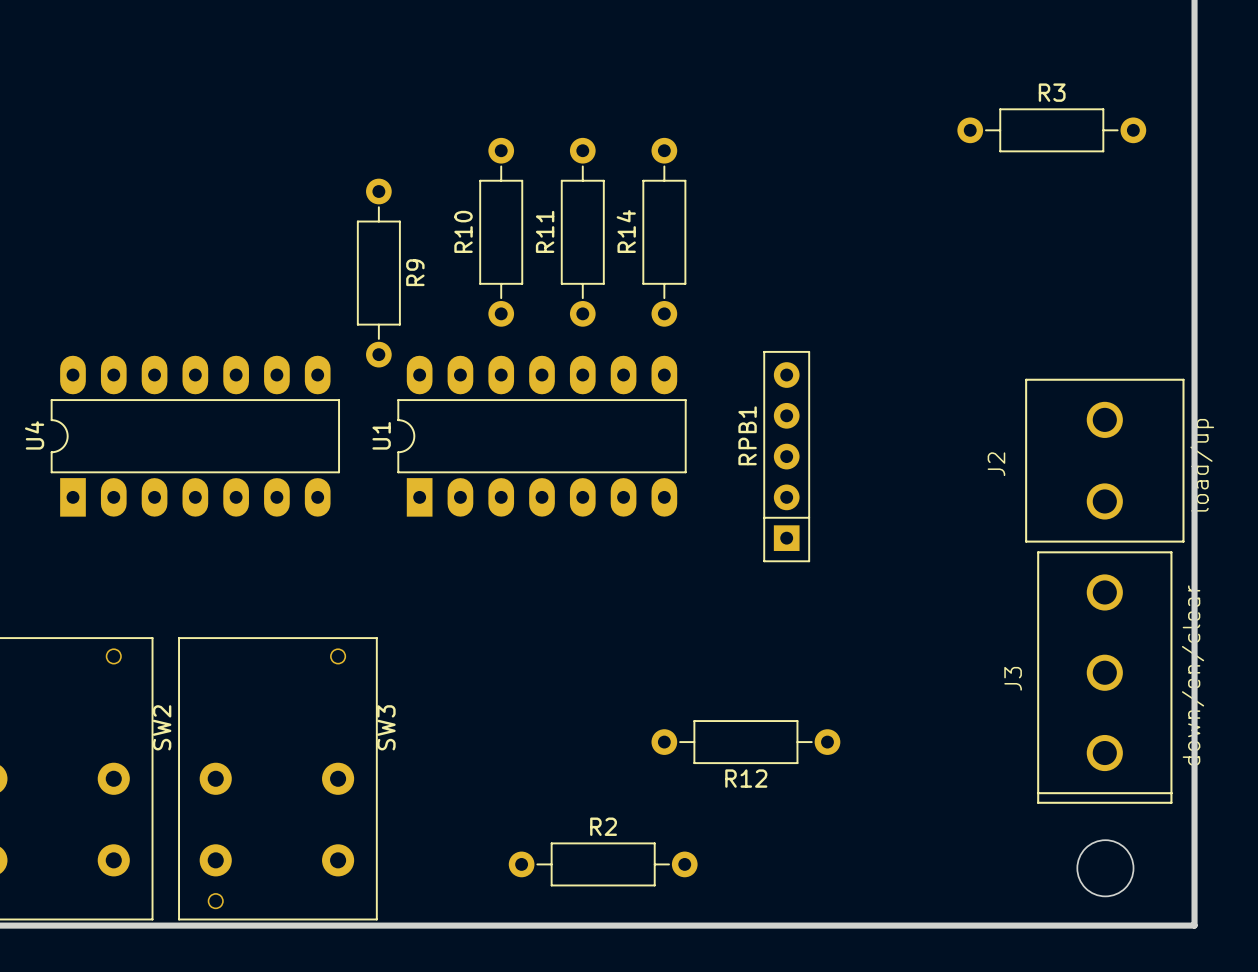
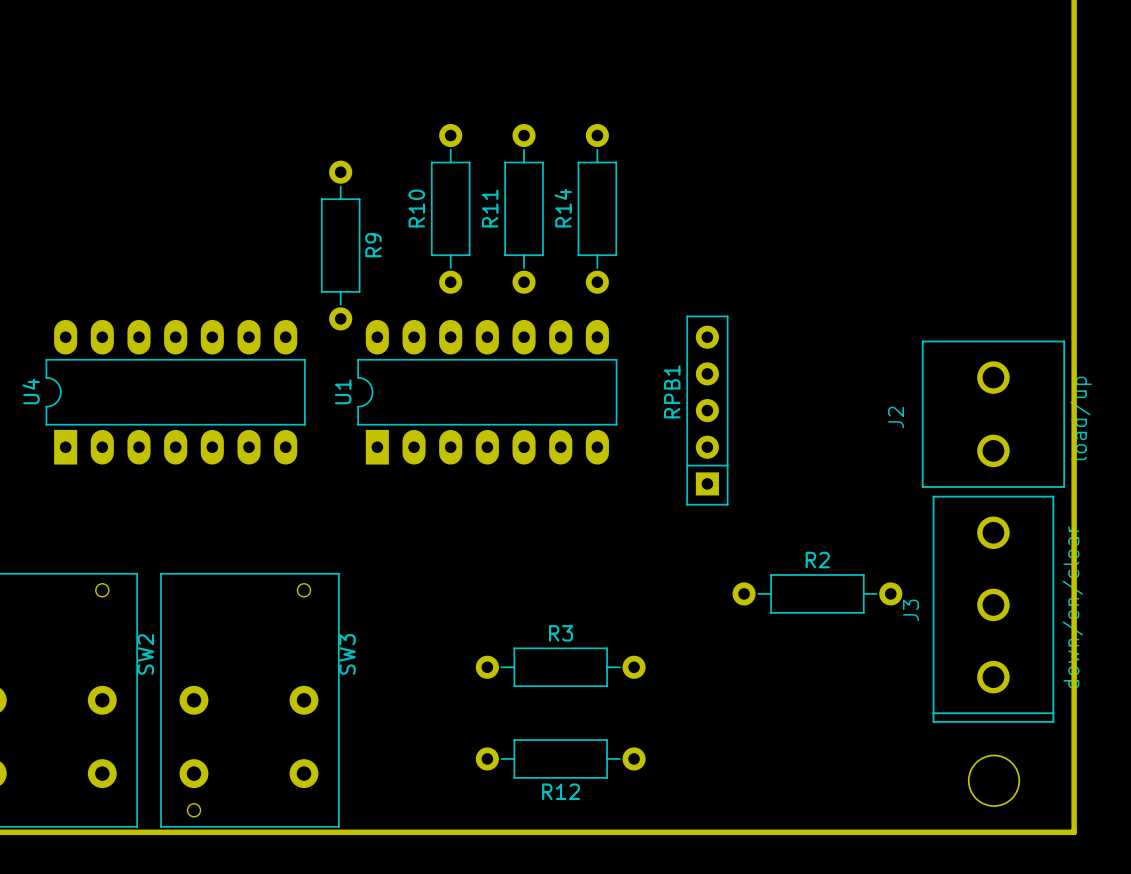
R3 position: (1051, 130) -> (560, 667)
R12 position: (745, 742) -> (560, 758)
R2 position: (603, 864) -> (817, 593)

